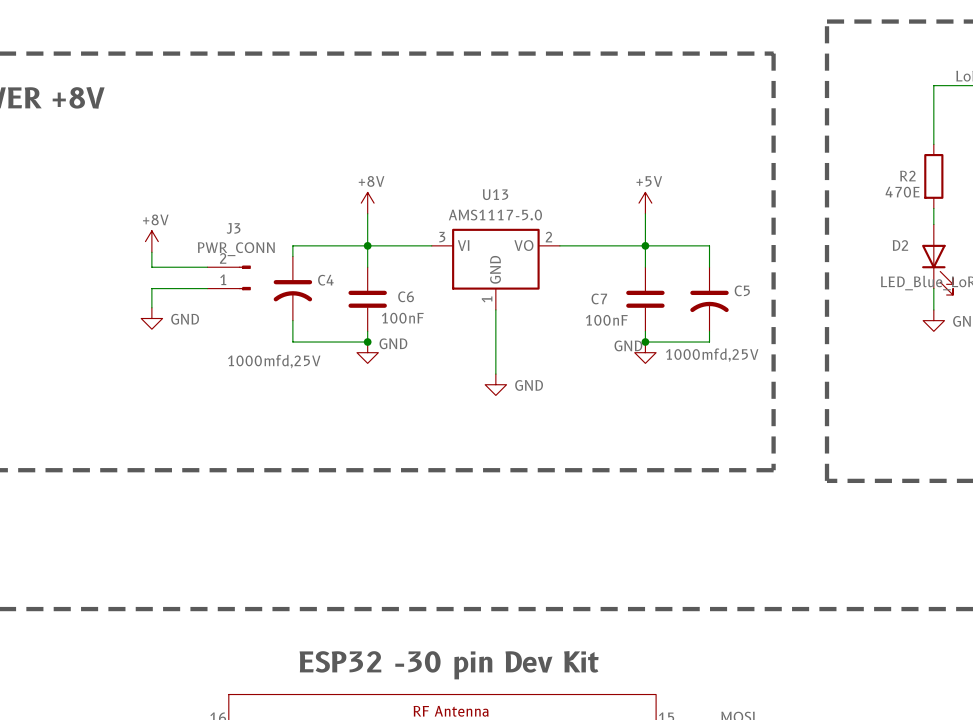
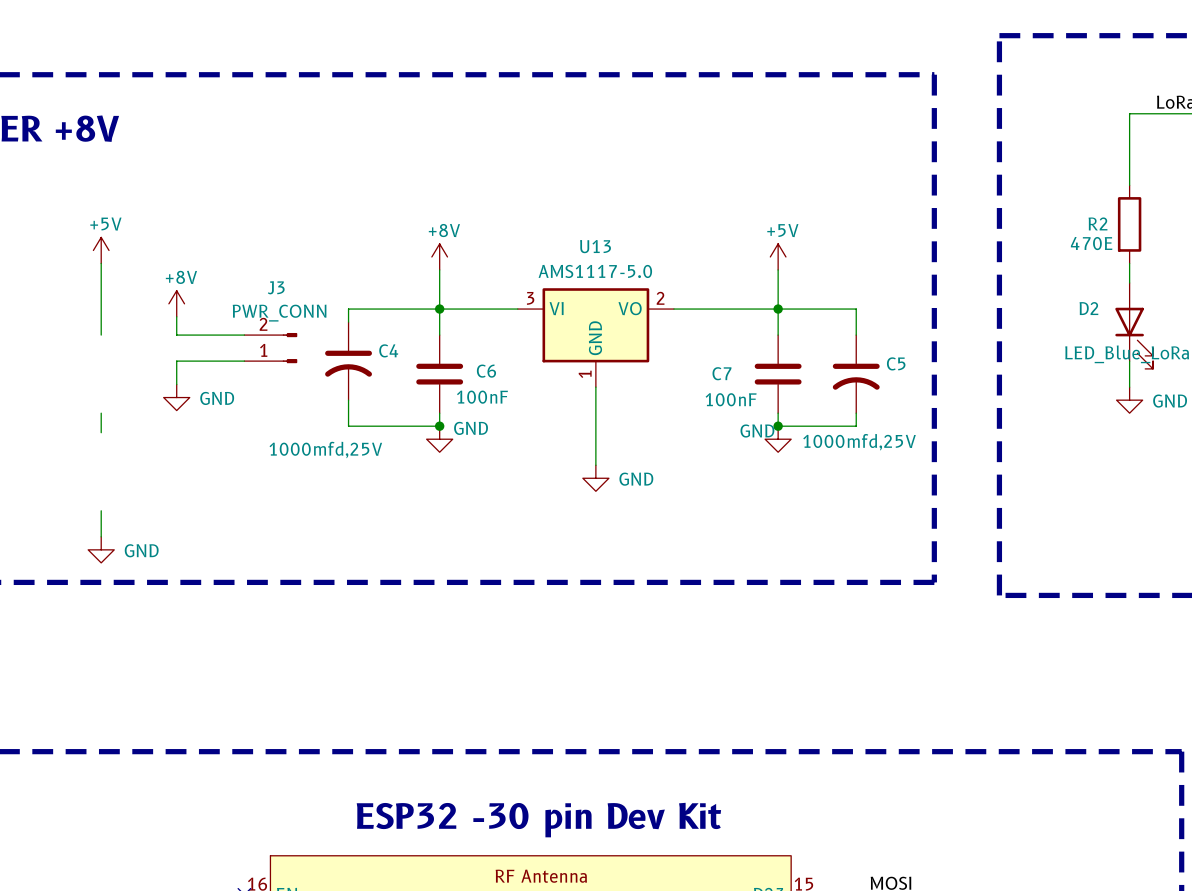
power symbol: none -> +5V (101, 250)
wire: none -> (101, 263) (101, 335)
wire: none -> (101, 413) (101, 432)
wire: none -> (101, 510) (101, 536)
power symbol: none -> GND (101, 549)

